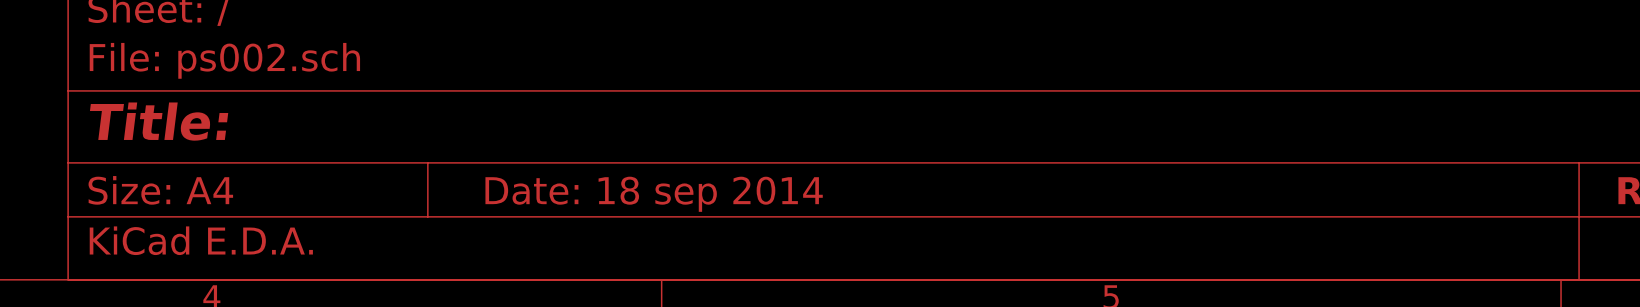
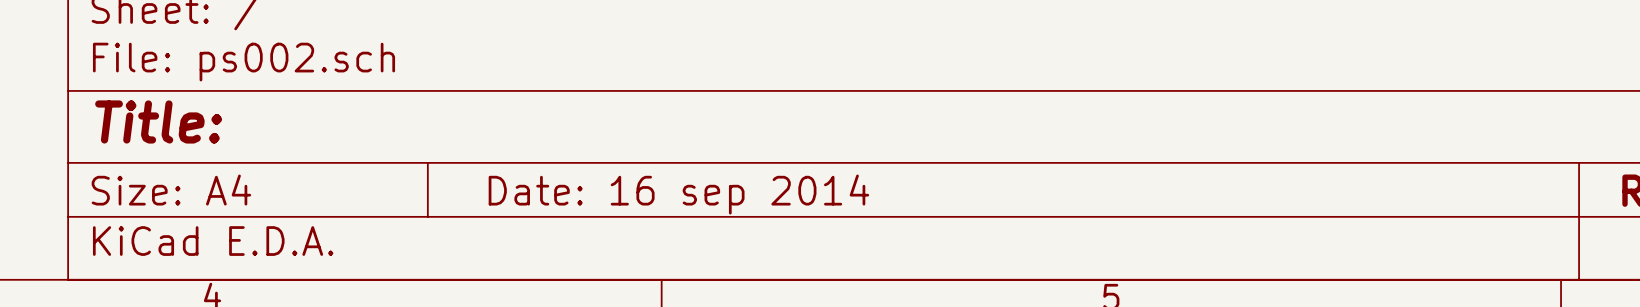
title block: Date: 18 sep 2014 (654, 194) -> Date: 16 sep 2014 (678, 194)

